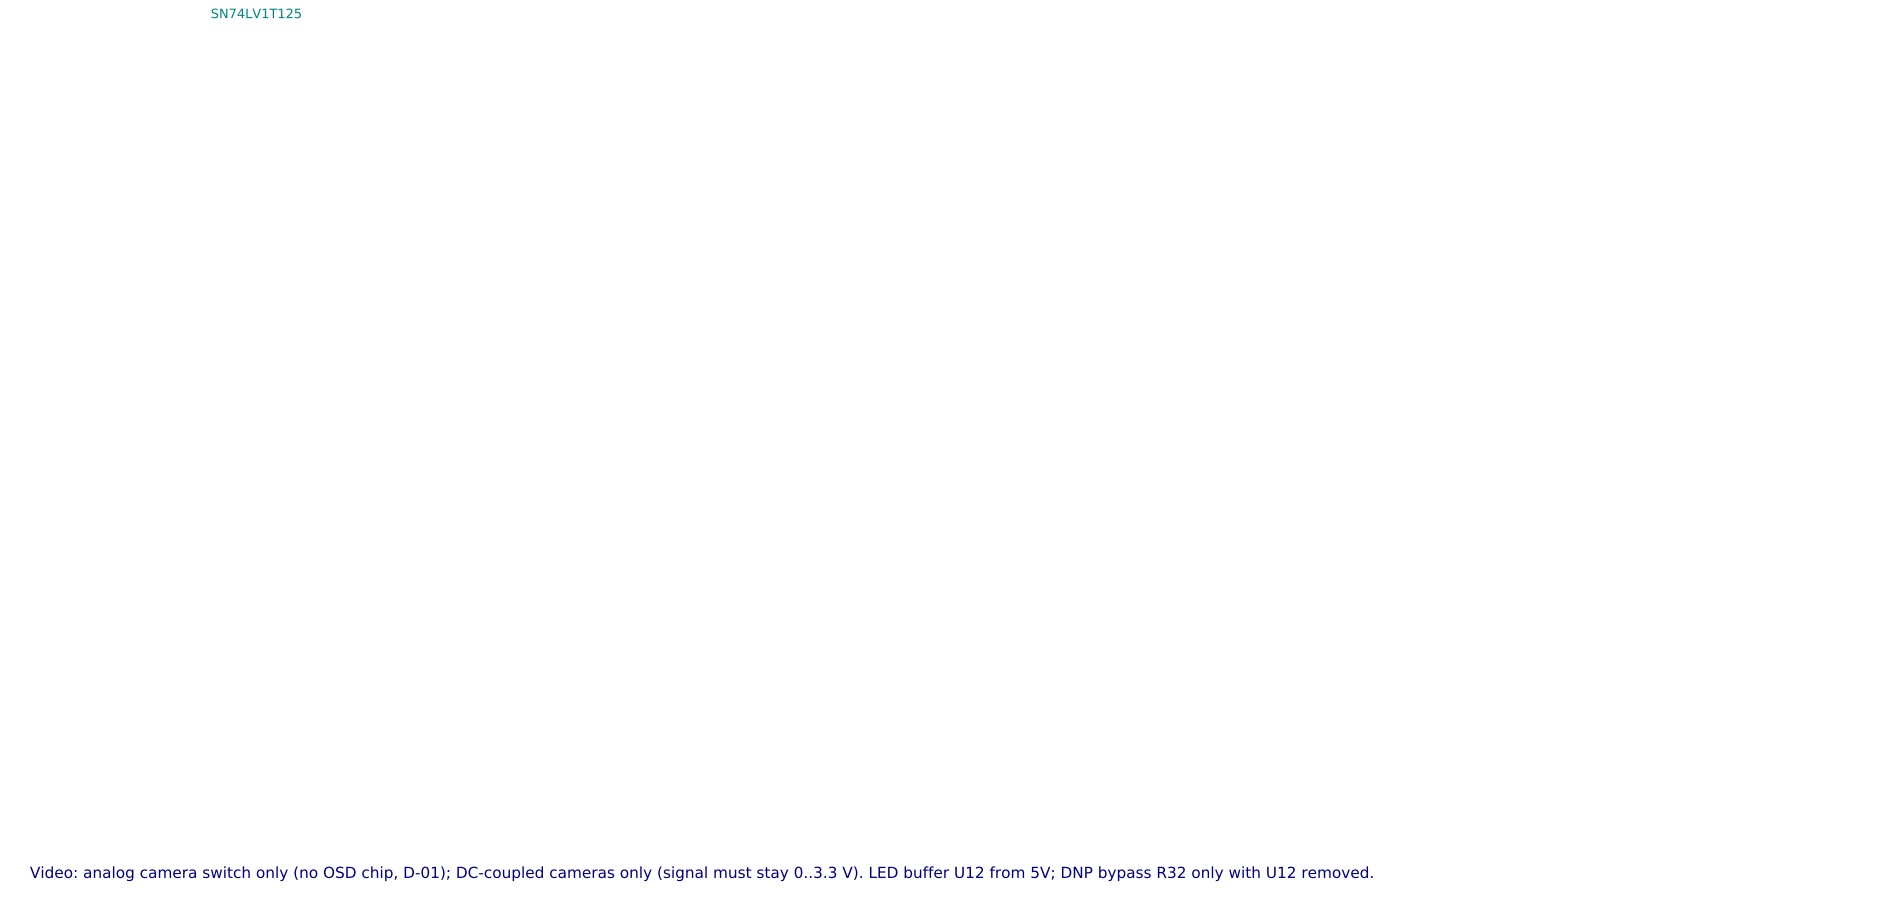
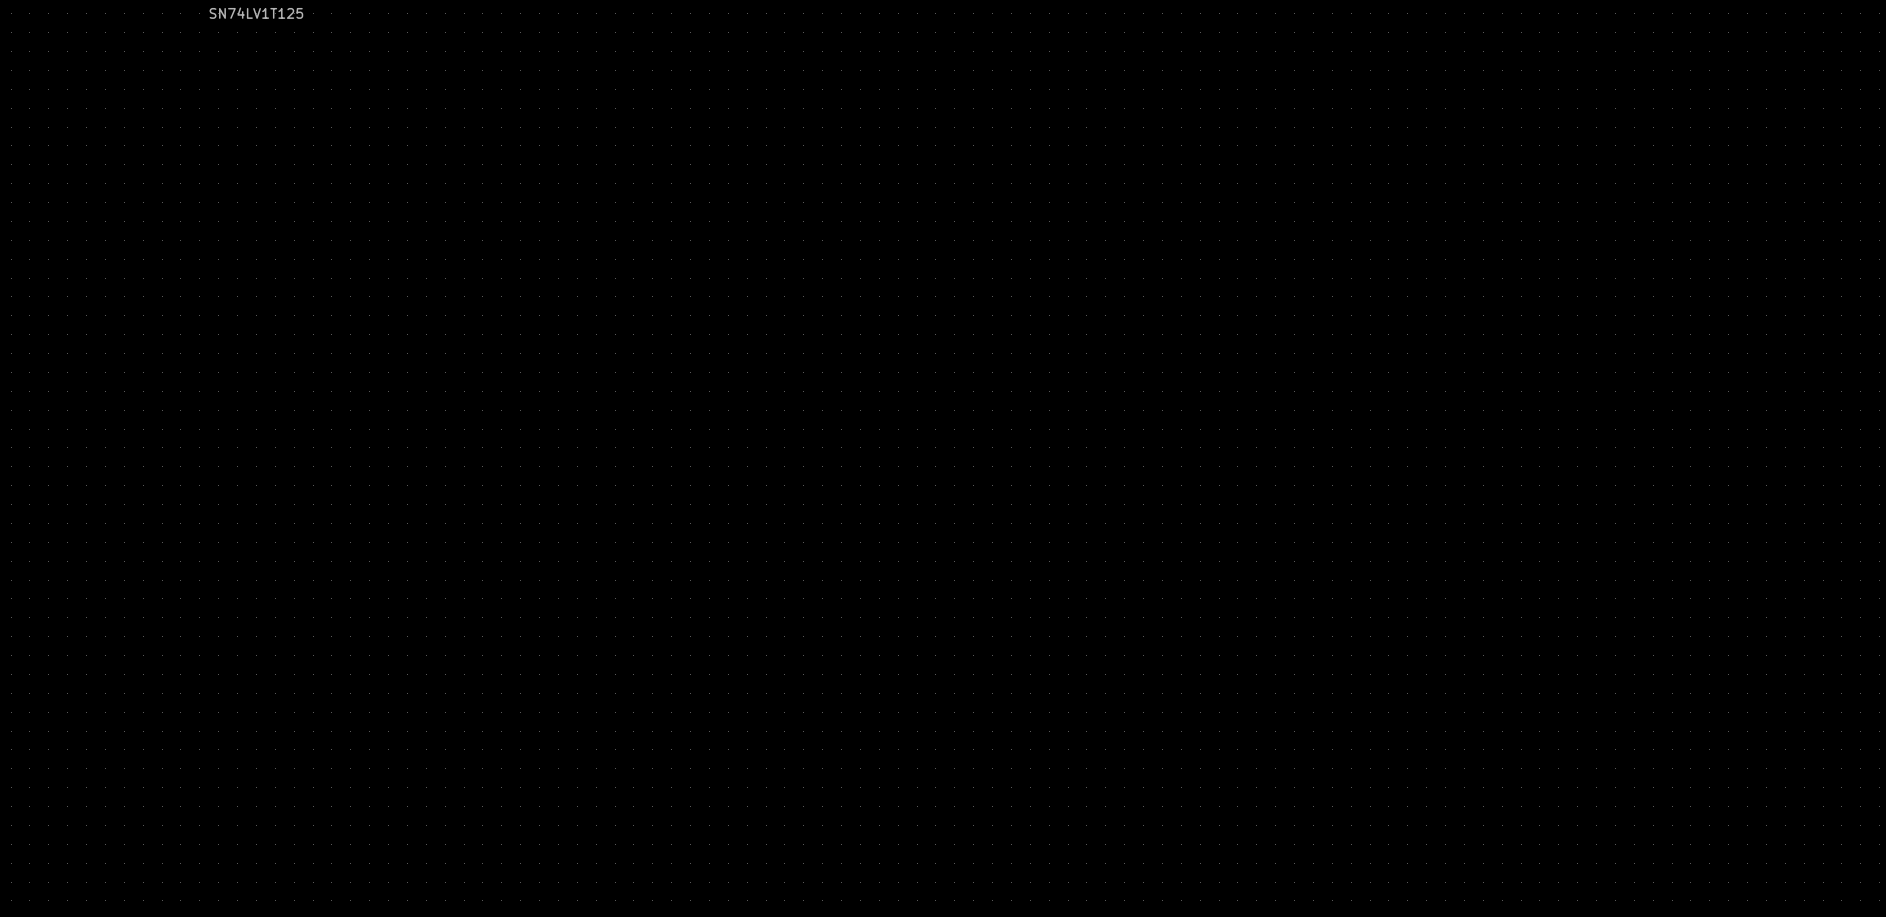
text: Video: analog camera switch only (no OSD chip, D-01); DC-coupled cameras only (signal must stay 0..3.3 V). LED buffer U12 from 5V; DNP bypass R32 only with U12 removed. (701, 873) -> none

